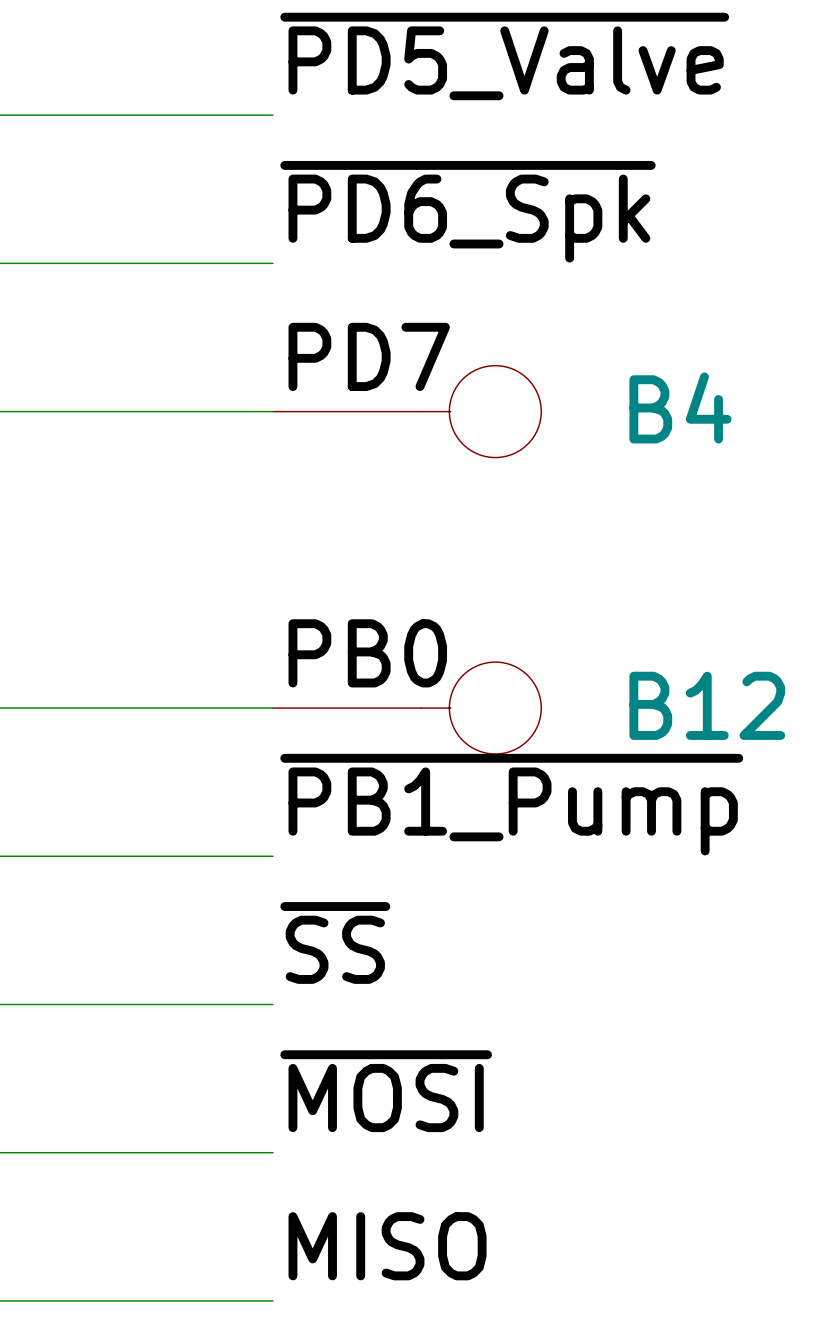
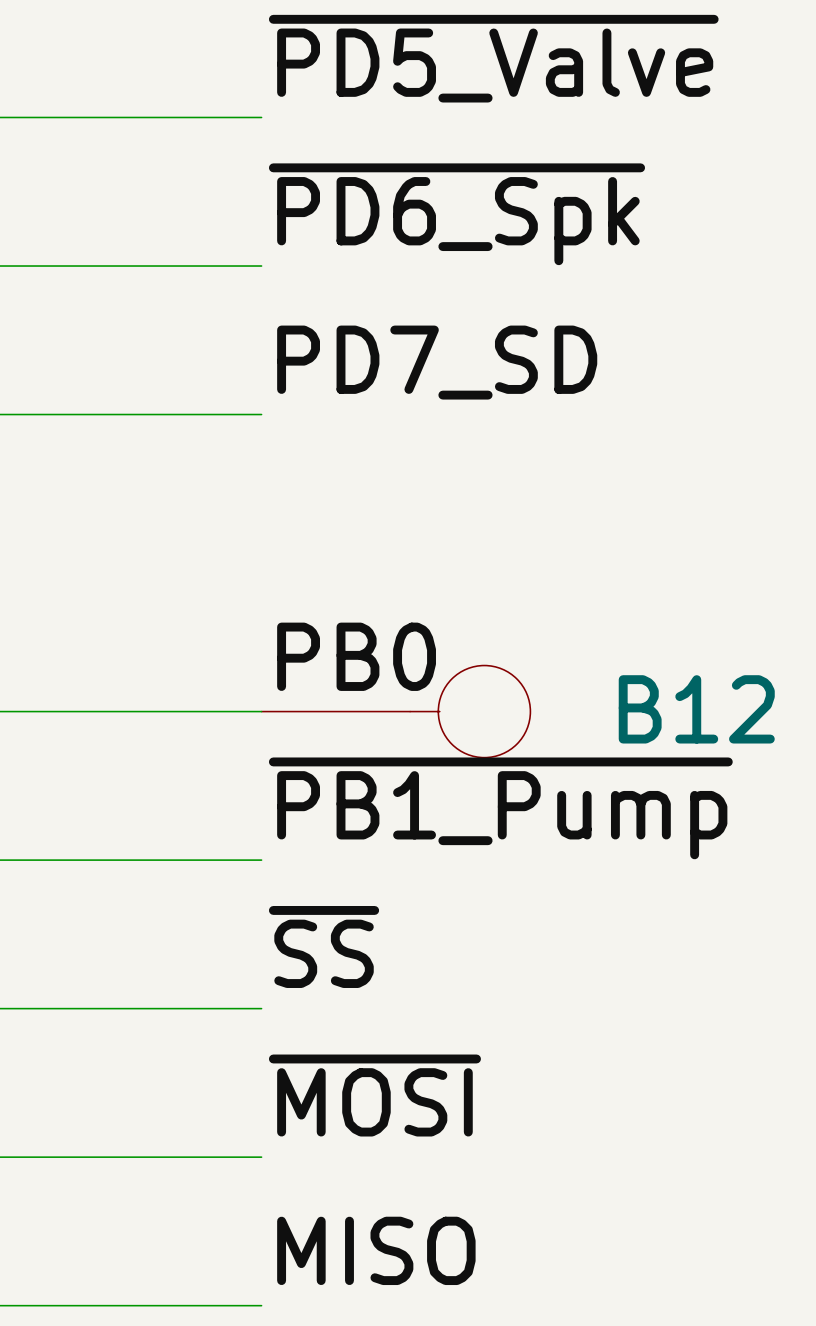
label: PD7 (369, 356) -> PD7_SD (437, 362)
B4: (407, 411) -> none

